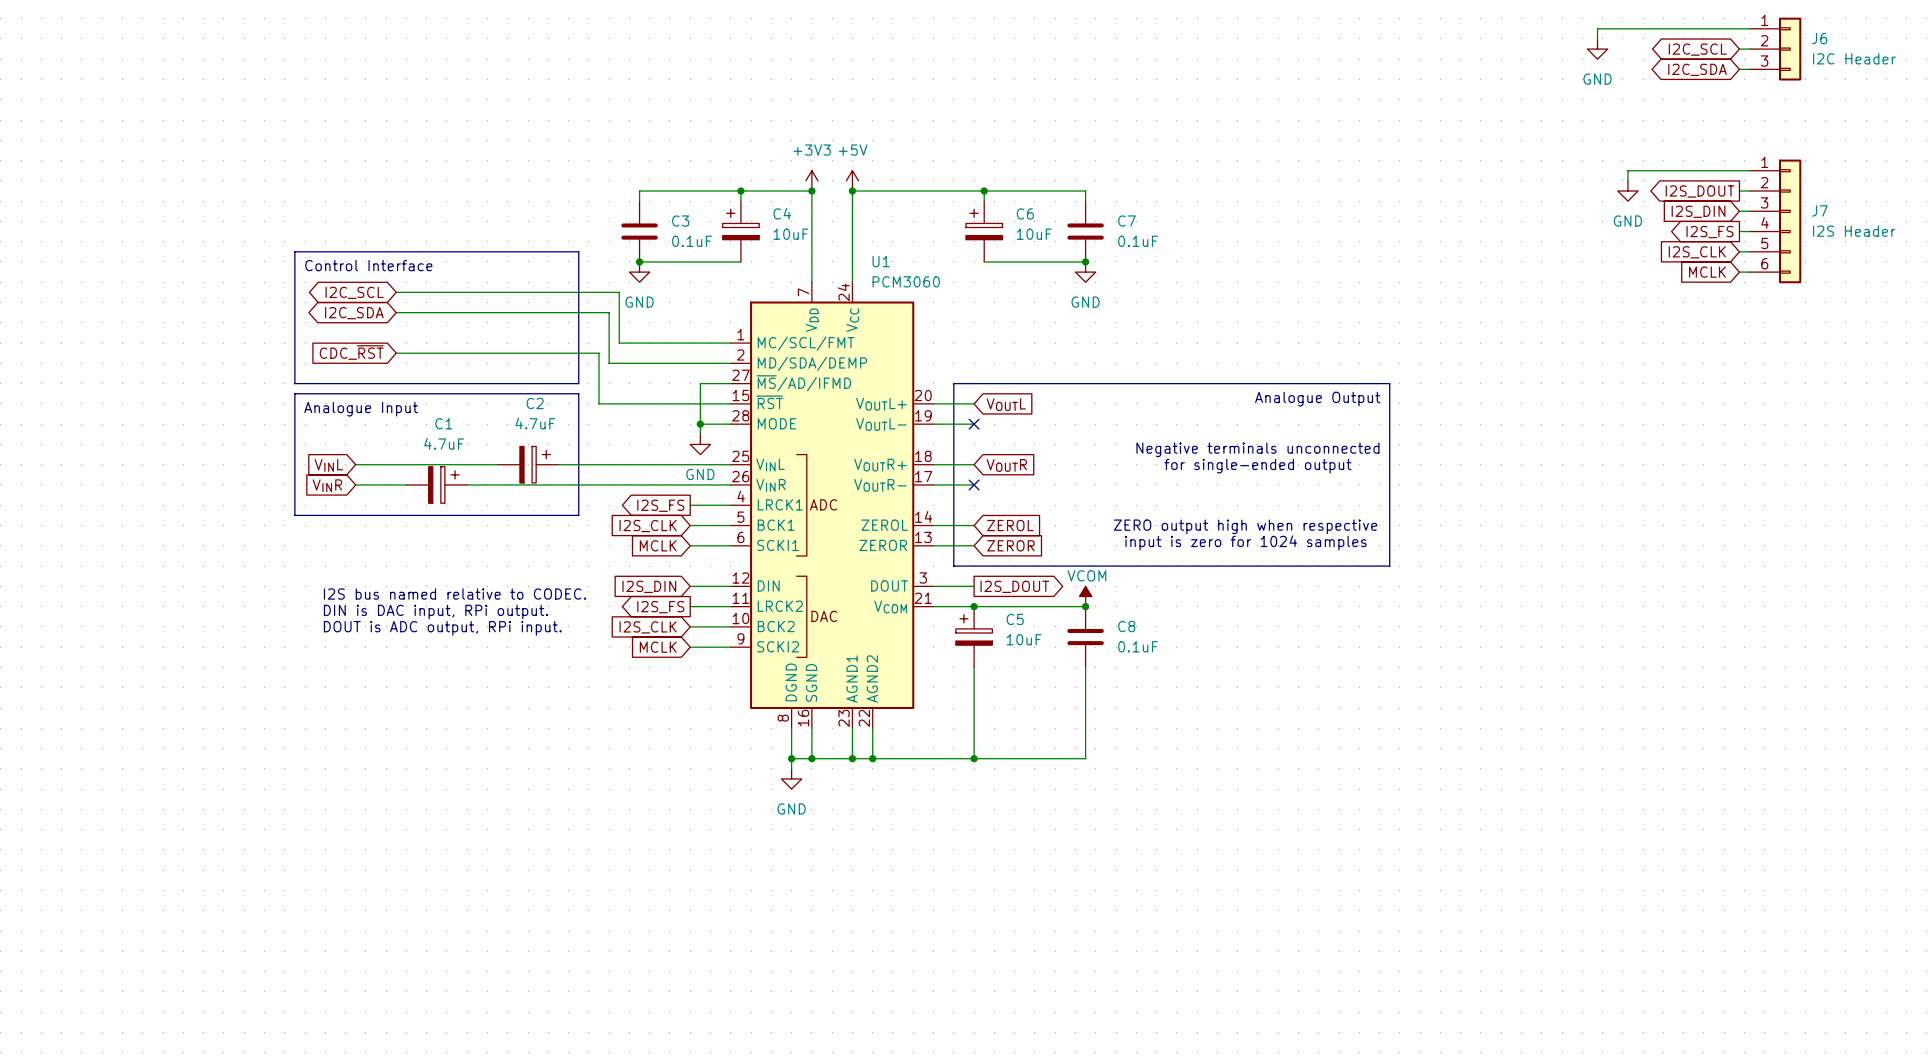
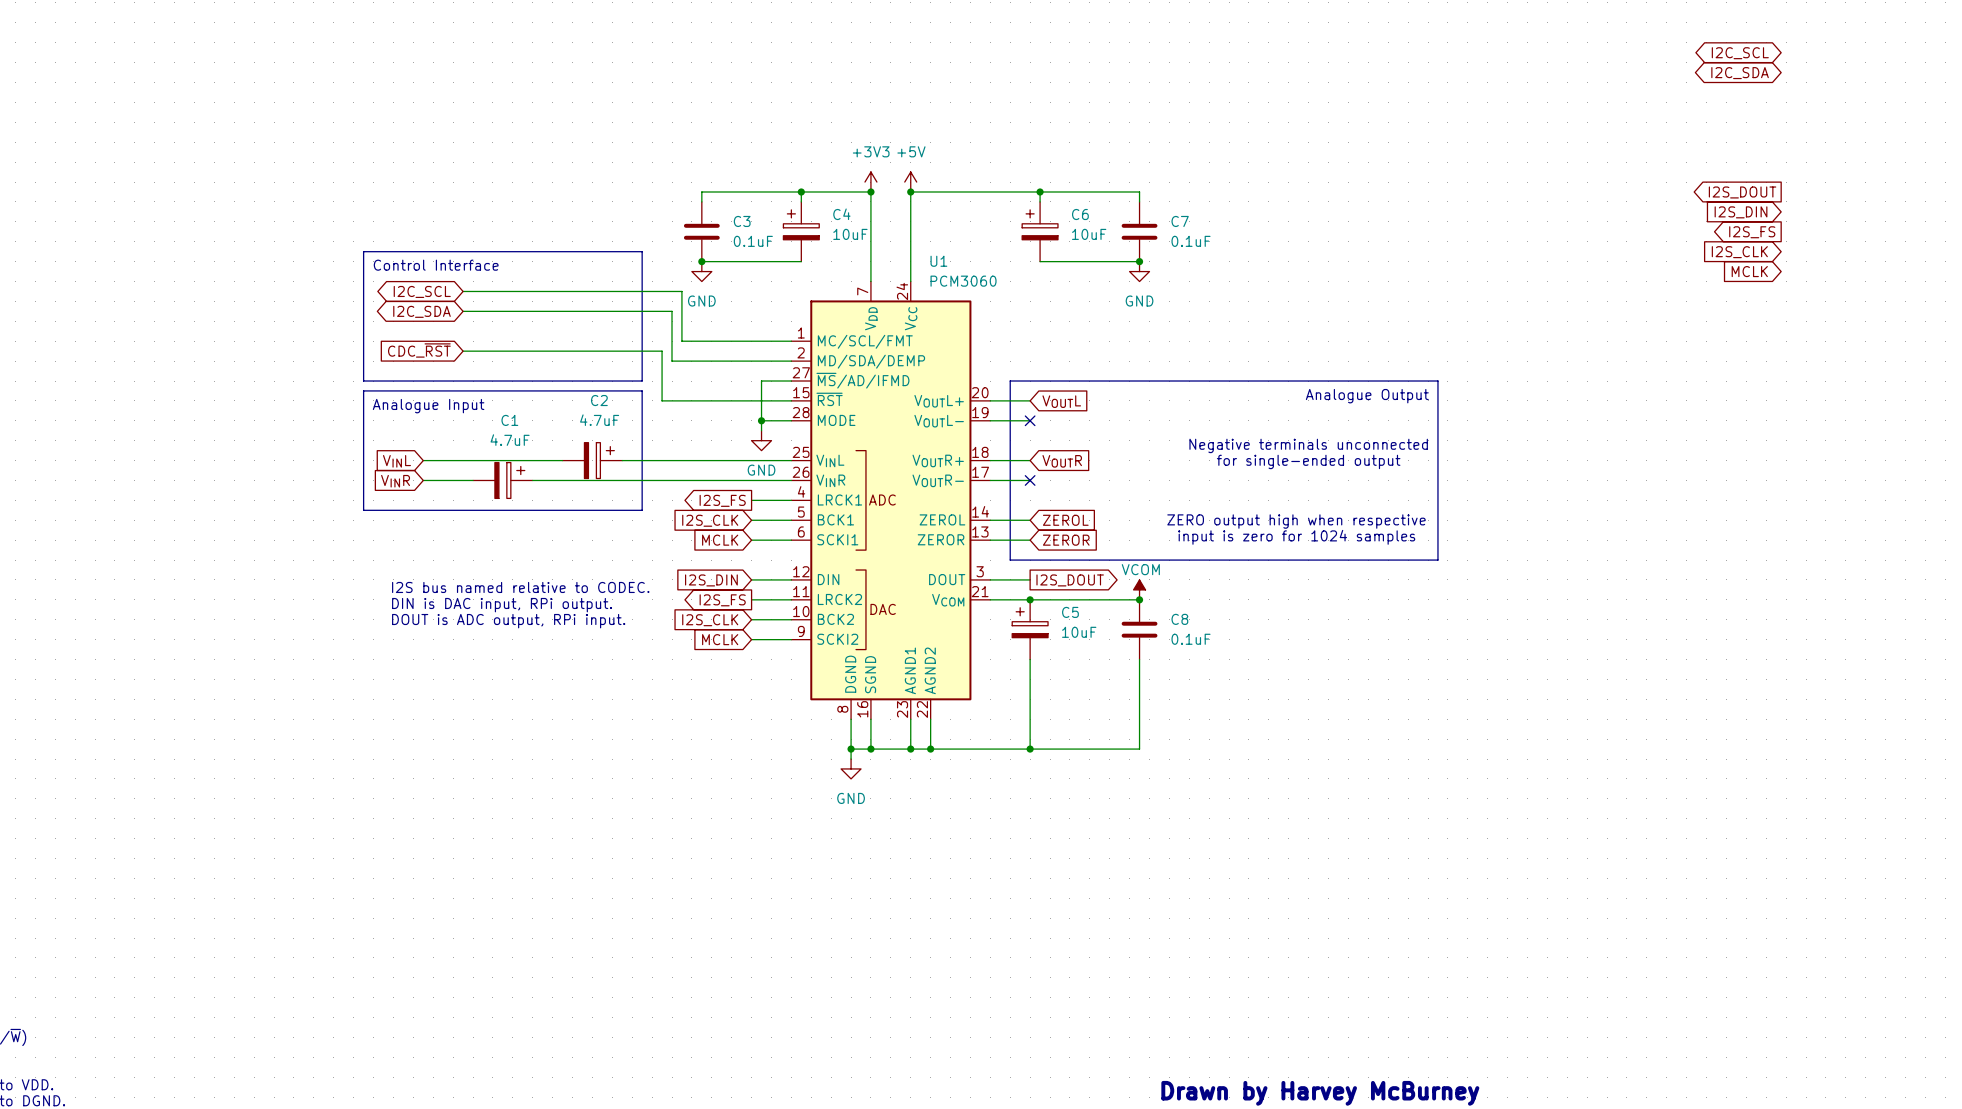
wire: (1749, 28) (1597, 28) (1597, 38) -> none
power symbol: GND (1597, 49) -> none
wire: (1739, 49) (1749, 49) -> none
J6: I2C Header (1775, 49) -> none
wire: (1739, 69) (1749, 69) -> none
wire: (1749, 170) (1627, 170) (1627, 180) -> none
power symbol: GND (1627, 191) -> none
wire: (1739, 191) (1749, 191) -> none
wire: (1739, 211) (1749, 211) -> none
J7: I2S Header (1775, 221) -> none
wire: (1739, 231) (1749, 231) -> none
wire: (1739, 251) (1749, 251) -> none
wire: (1739, 272) (1749, 272) -> none

